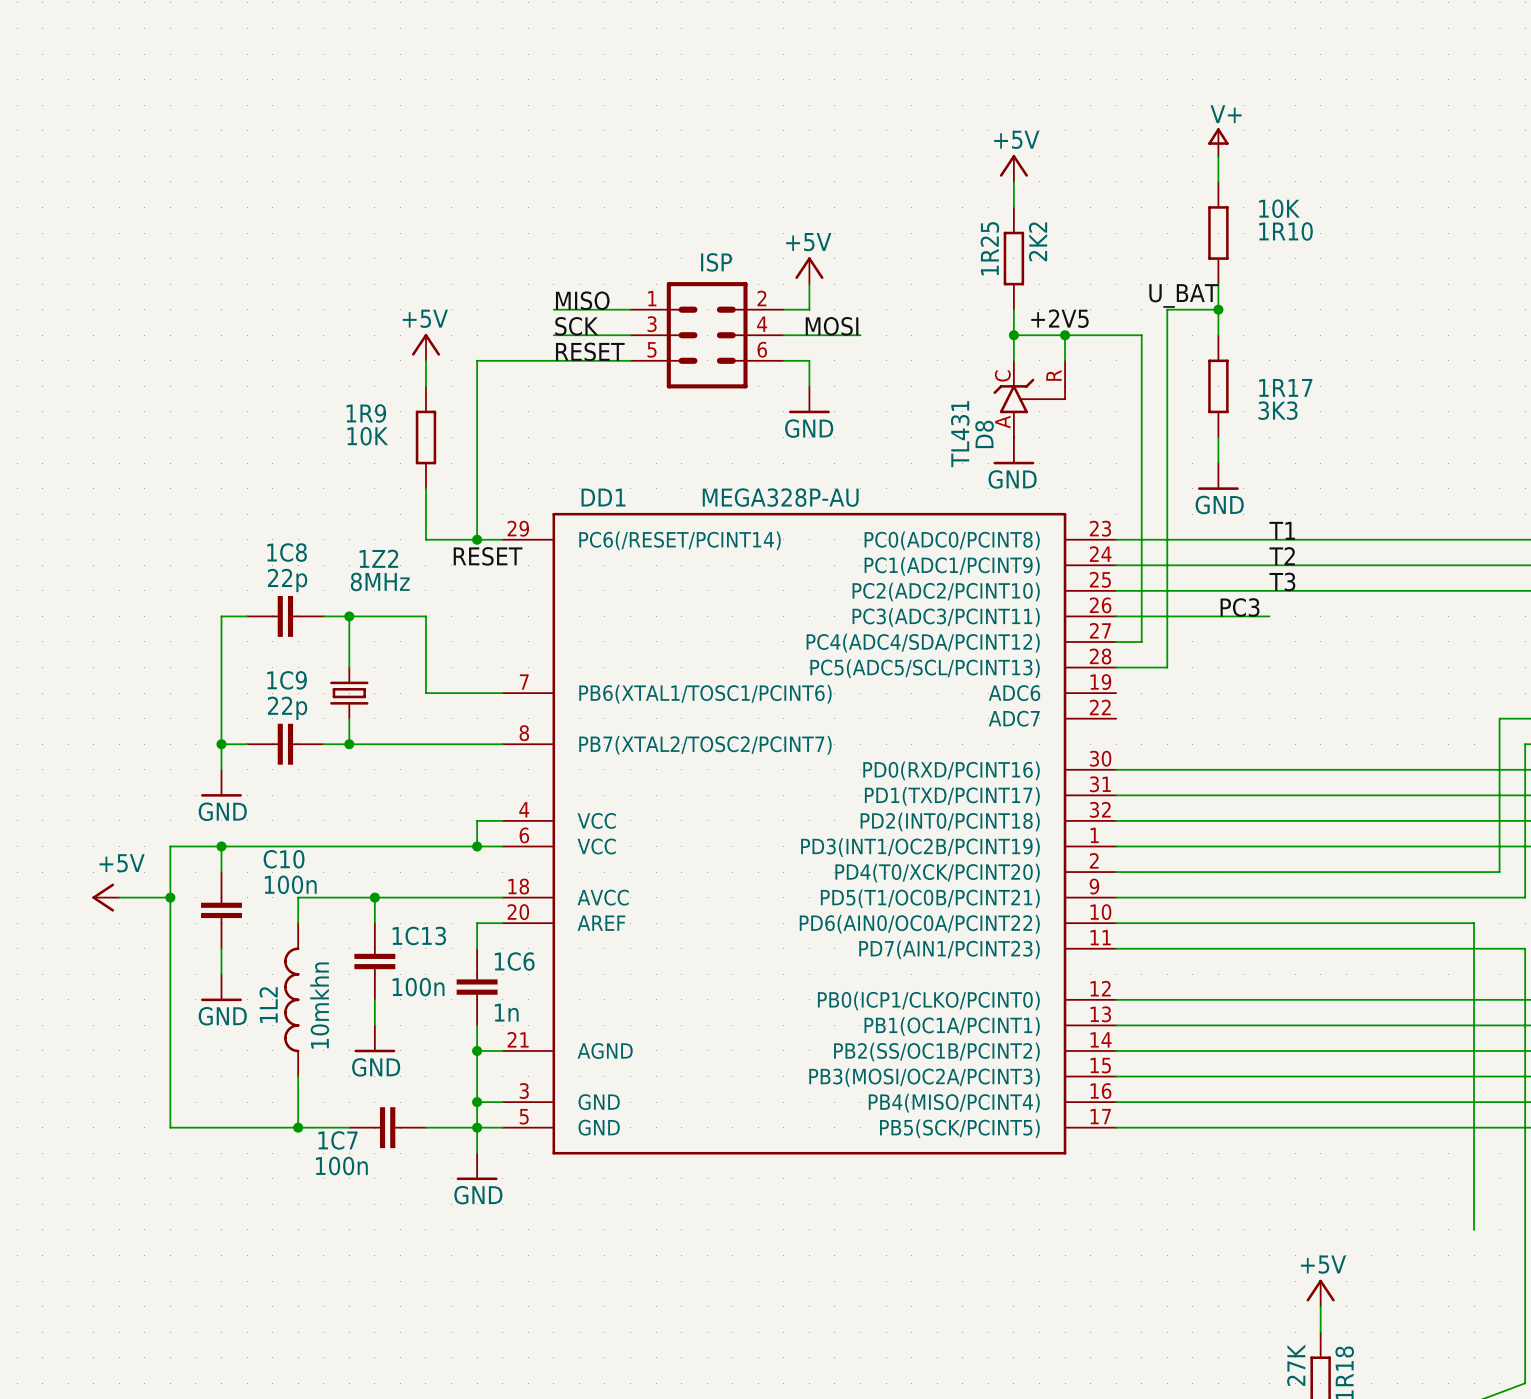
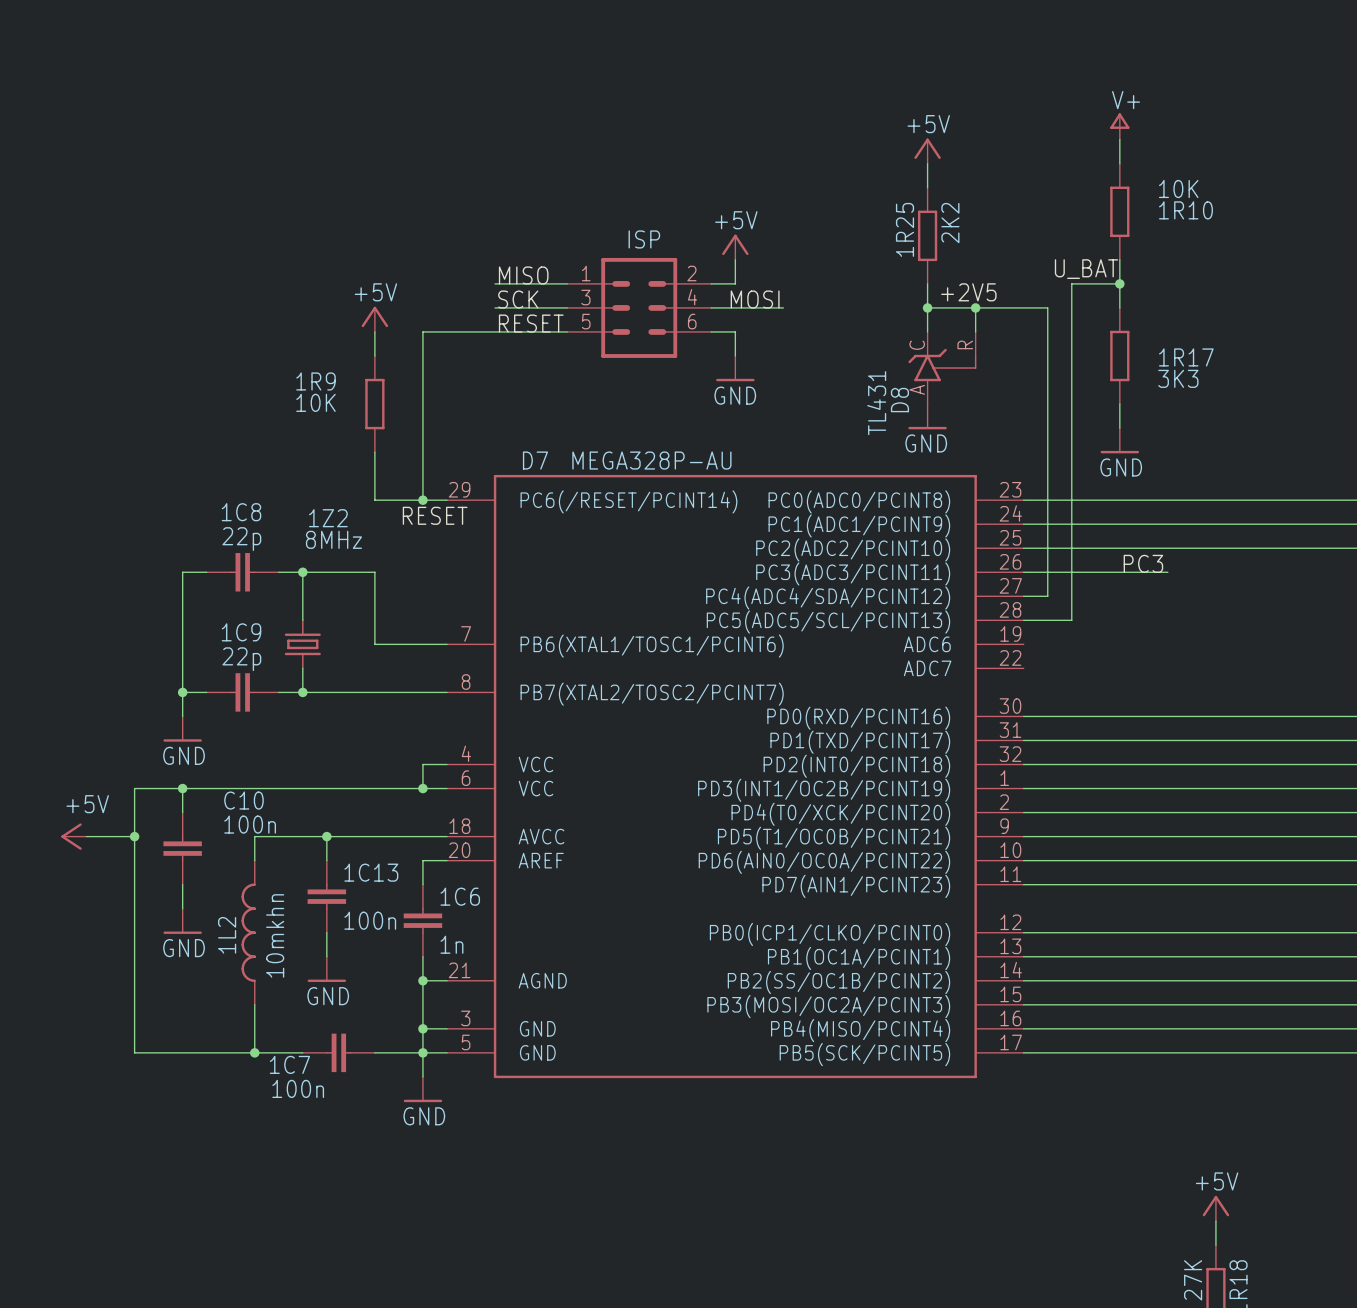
DD1 name: DD1 (603, 497) -> D7 (535, 460)
DD1 value position: MEGA328P-AU (780, 497) -> MEGA328P-AU (651, 460)
label: T1 (1282, 530) -> none
label: T2 (1282, 556) -> none
label: T3 (1282, 581) -> none

